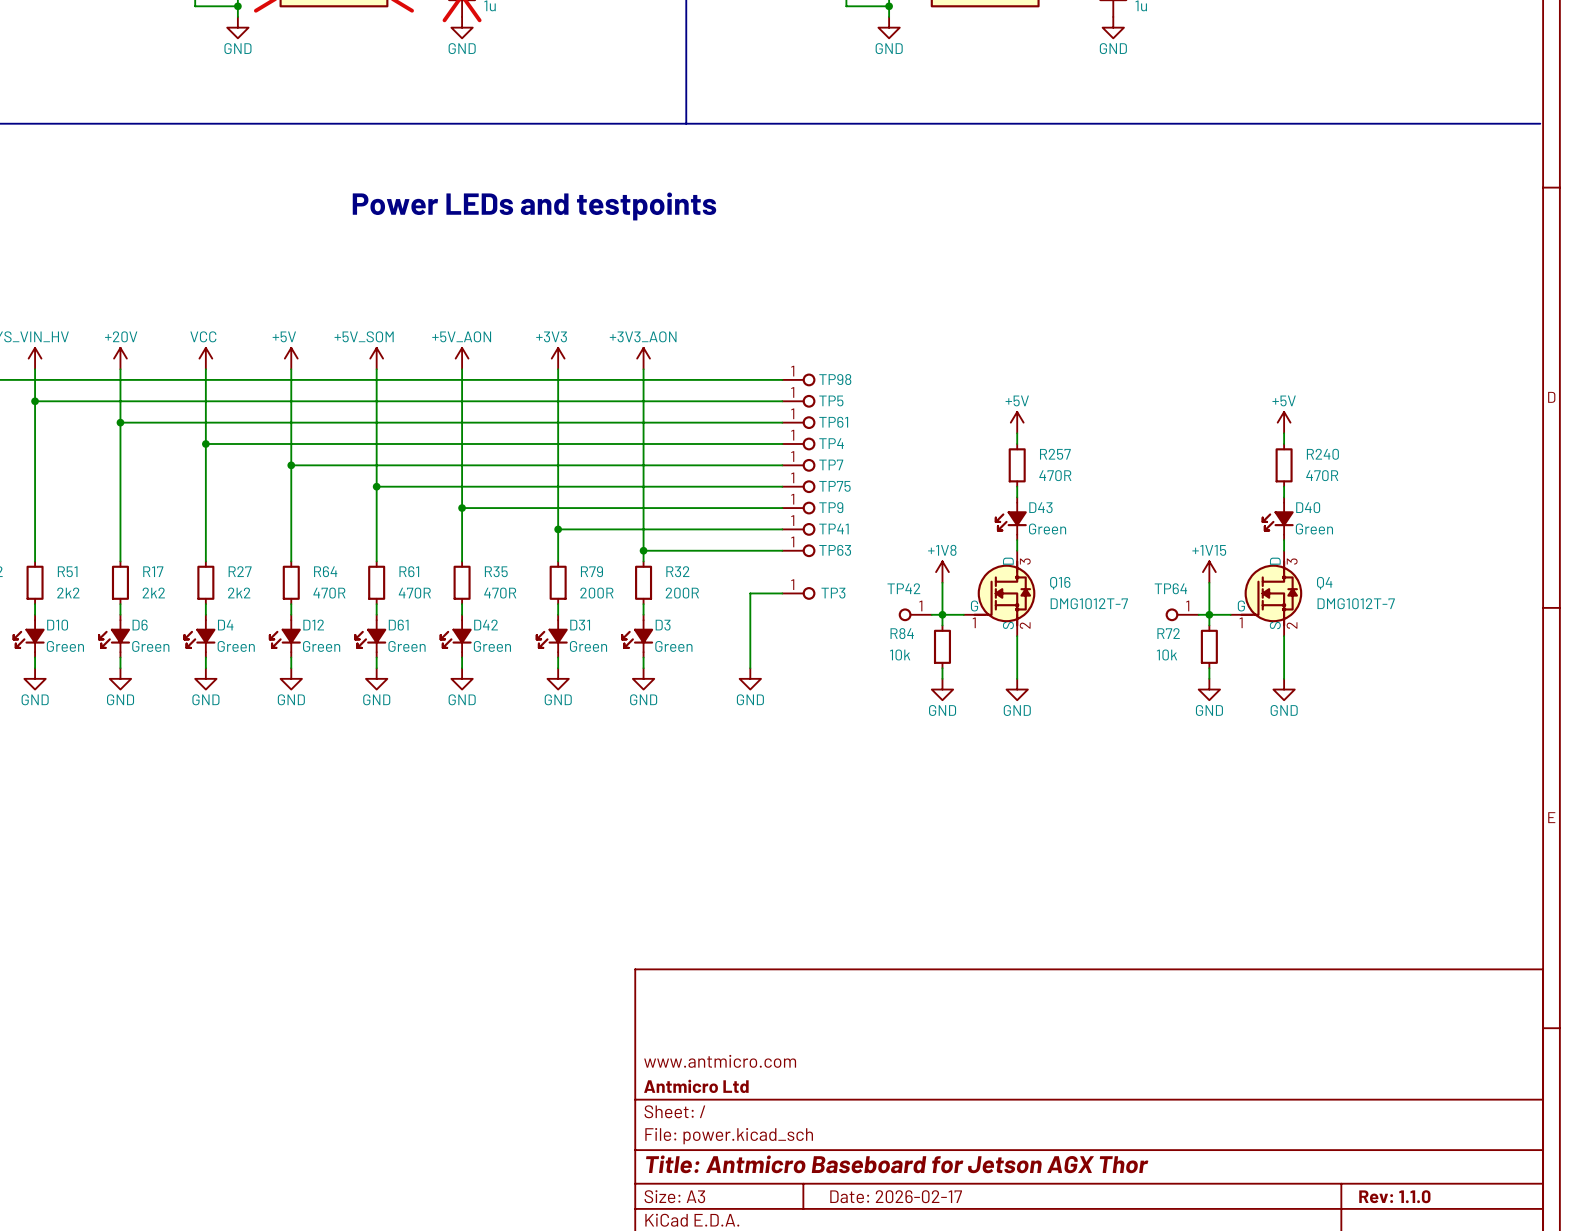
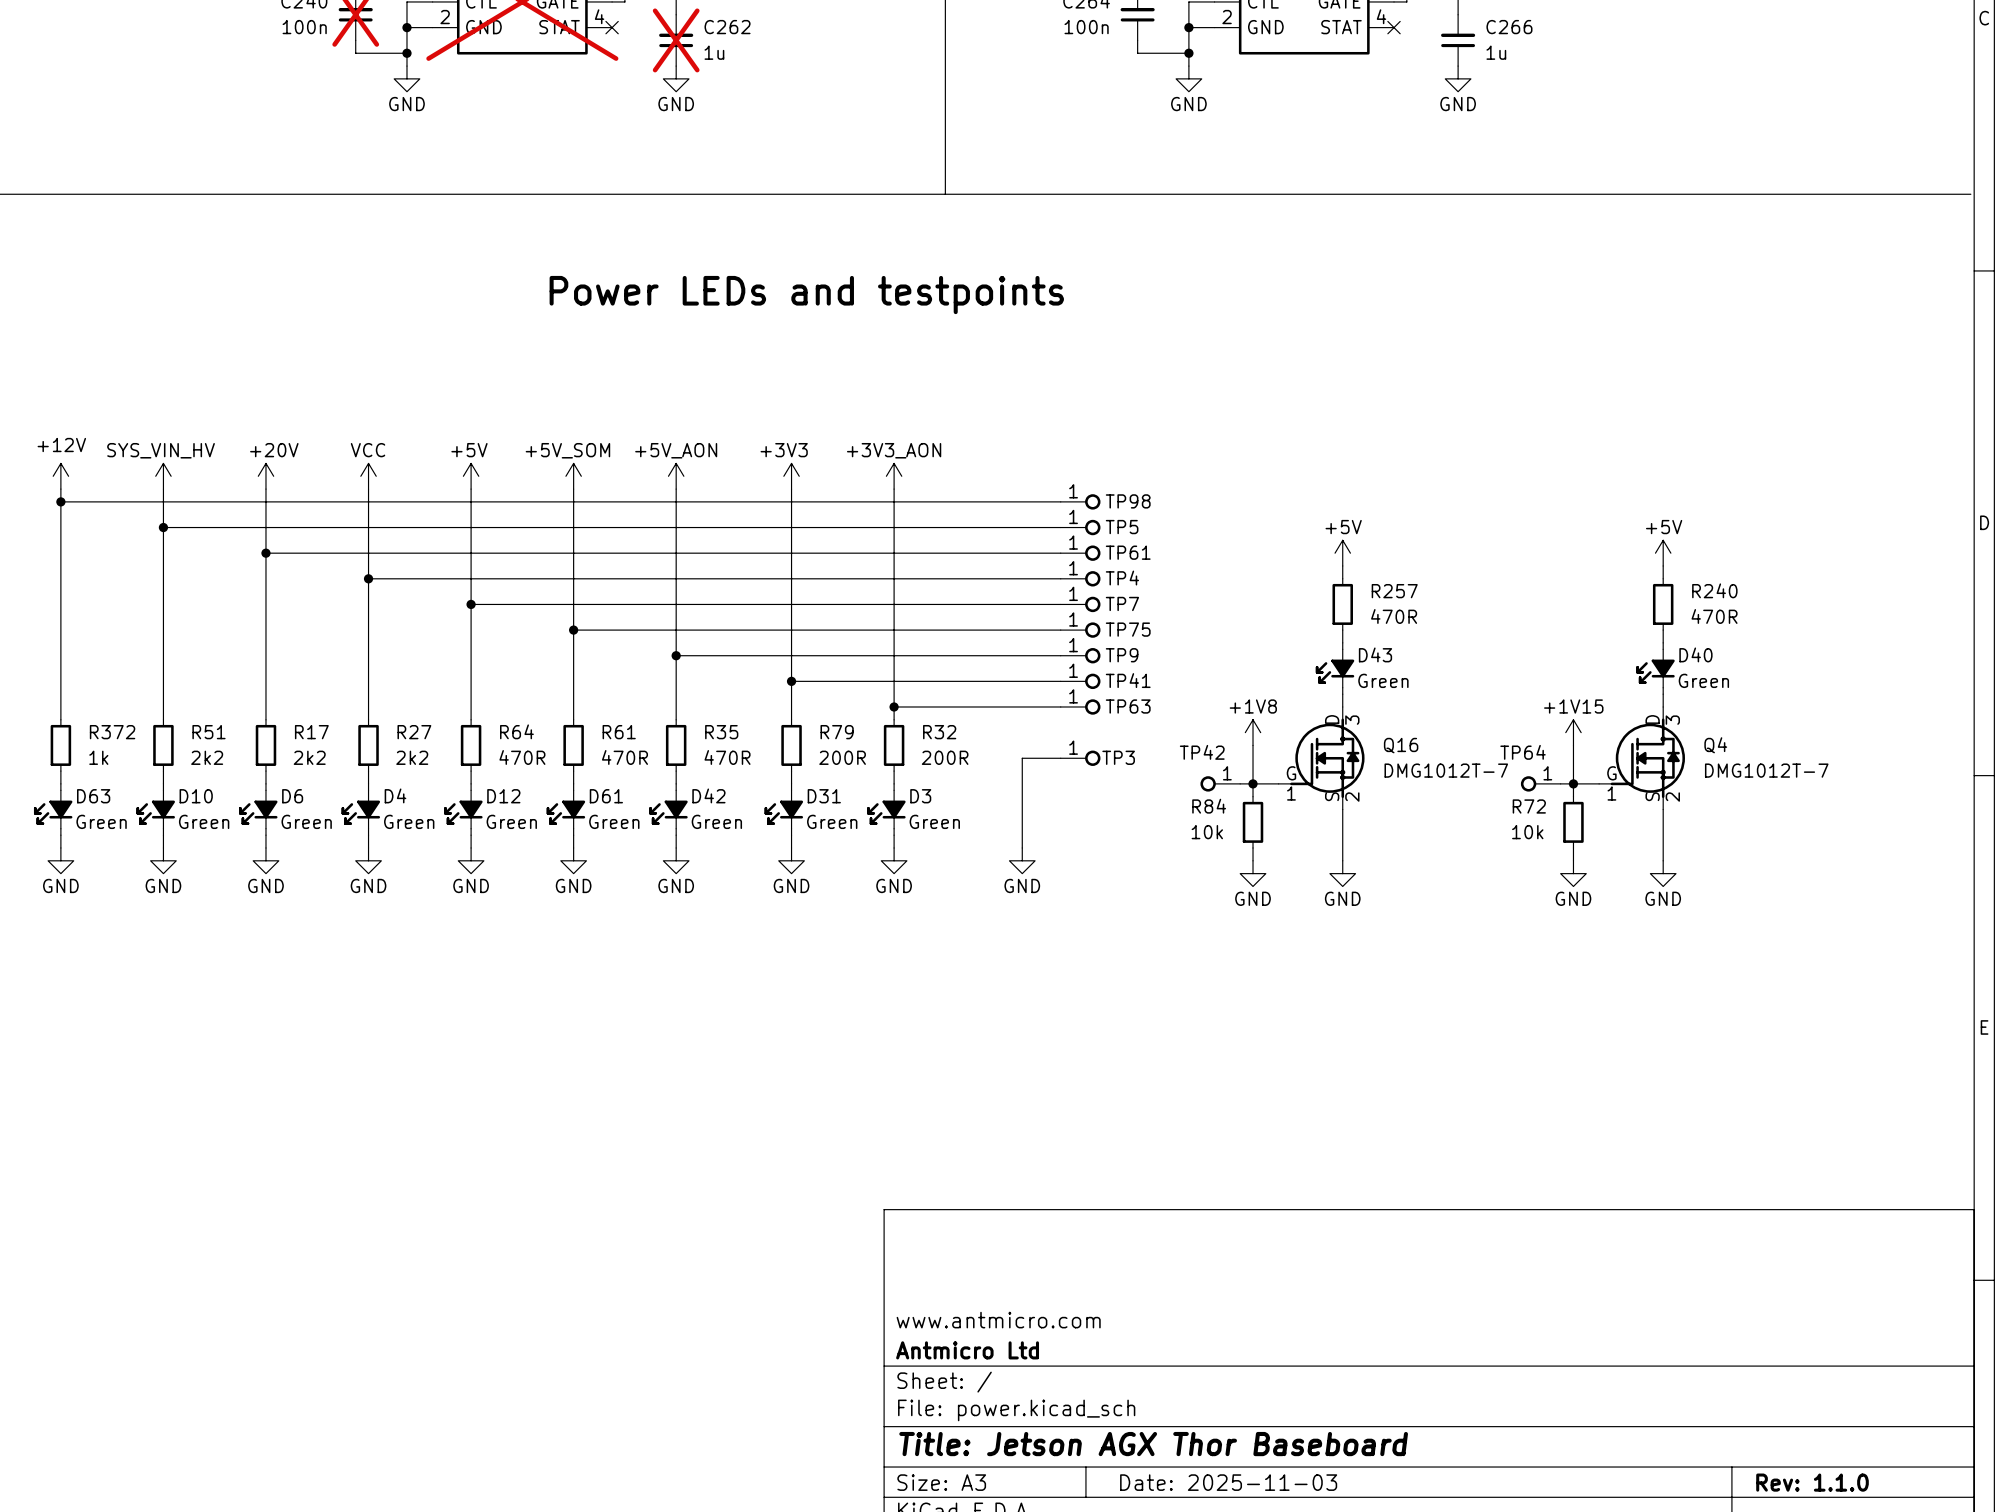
title block: Title: Antmicro Baseboard for Jetson AGX Thor (897, 1164) -> Title: Jetson AGX Thor Baseboard (1153, 1444)
title block: Date: 2026-02-17 (896, 1196) -> Date: 2025-11-03 (1228, 1482)

